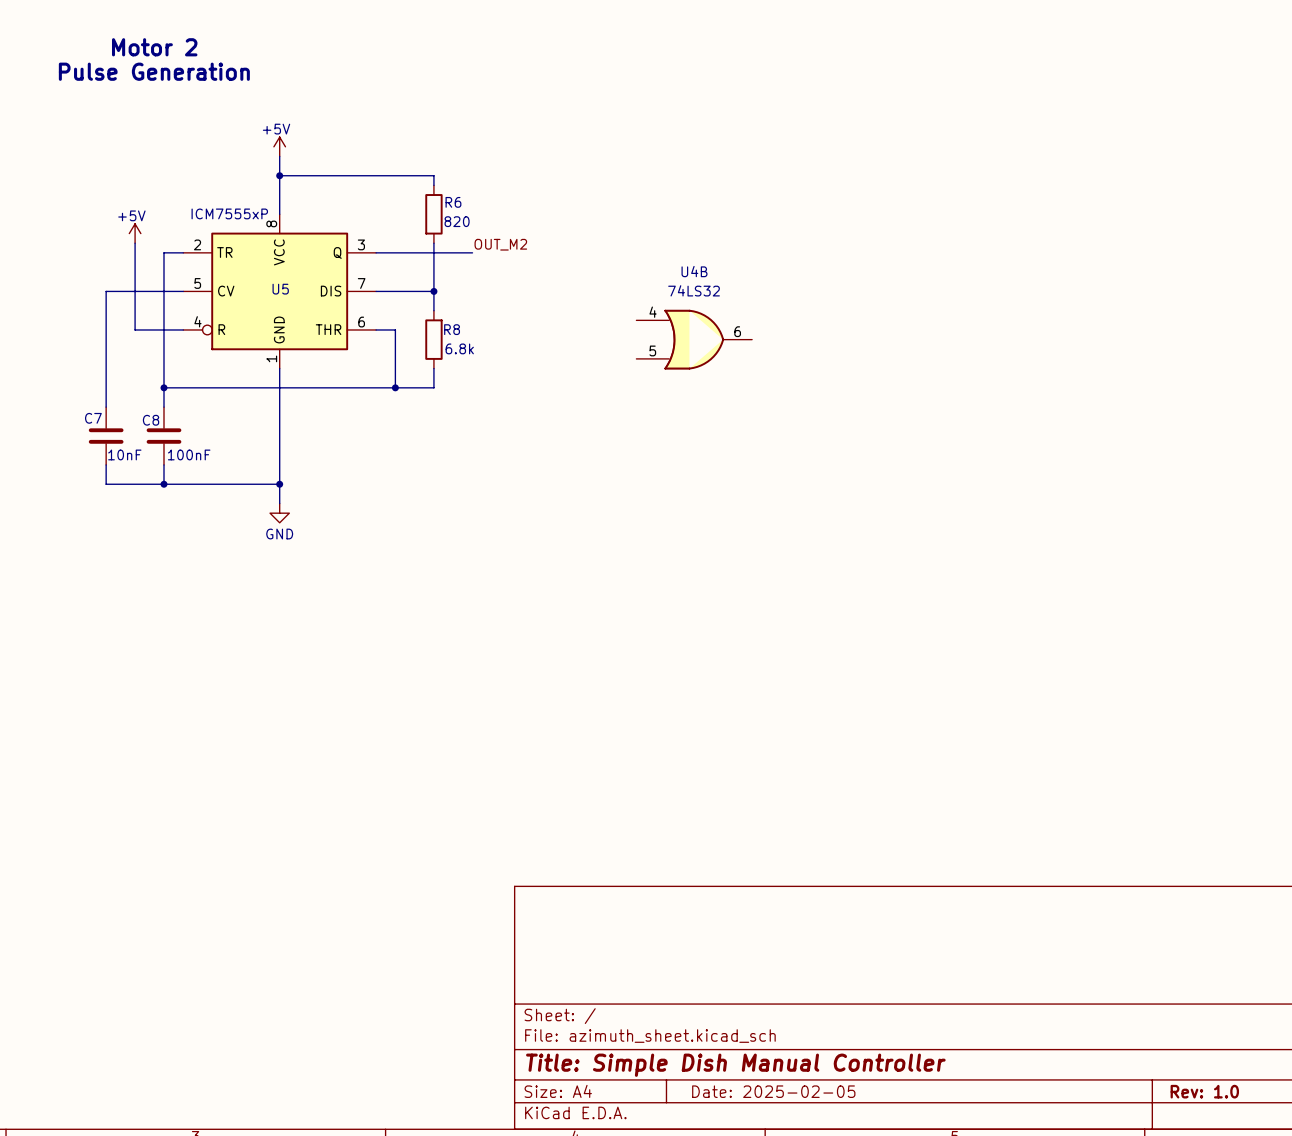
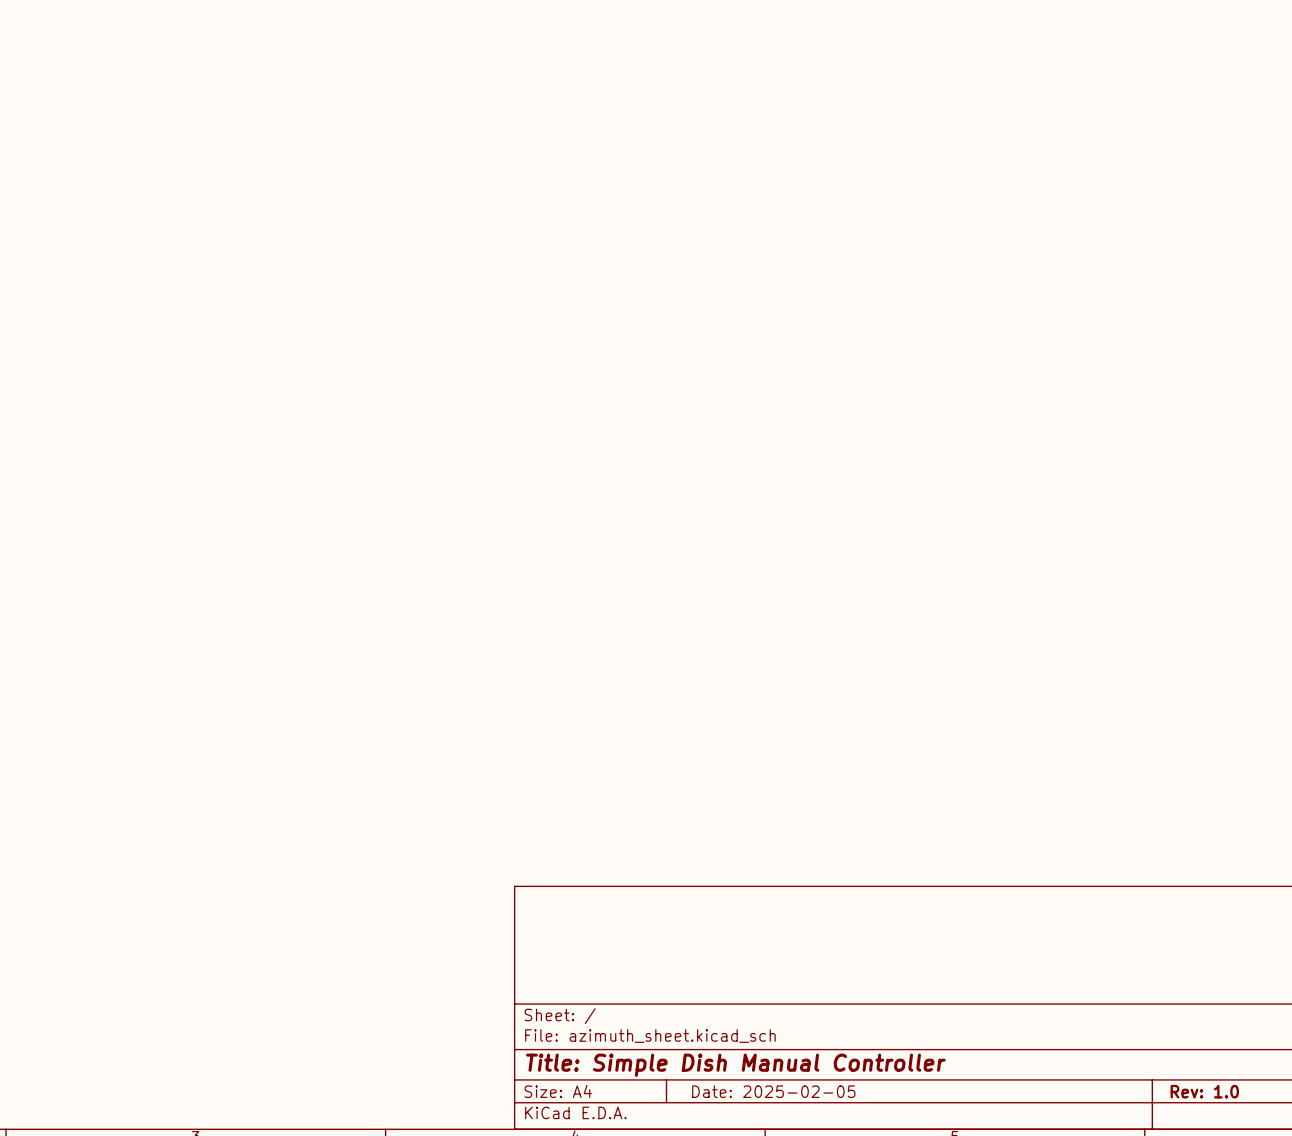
text: Motor 2 (154, 47) -> none
text: Pulse Generation (154, 71) -> none
power symbol: +5V (279, 146) -> none
wire: (279, 156) (279, 214) -> none
wire: (279, 175) (433, 175) (433, 185) -> none
junction: (279, 175) -> none
R6: 820 (433, 214) -> none
power symbol: +5V (135, 233) -> none
wire: (135, 243) (135, 329) (183, 329) -> none
wire: (433, 243) (433, 310) -> none
label: OUT_M2 (500, 244) -> none
wire: (183, 252) (163, 252) (163, 407) -> none
wire: (376, 252) (472, 252) -> none
wire: (183, 291) (106, 291) (106, 407) -> none
U5: ICM7555xP (279, 291) -> none
wire: (376, 291) (433, 291) -> none
junction: (433, 291) -> none
wire: (376, 329) (395, 329) (395, 387) -> none
R8: 6.8k (433, 339) -> none
U4B: 74LS32 (694, 339) -> none
wire: (279, 368) (279, 503) -> none
wire: (433, 368) (433, 387) (163, 387) -> none
junction: (163, 387) -> none
junction: (395, 387) -> none
C7: 10nF (106, 436) -> none
C8: 100nF (163, 436) -> none
wire: (106, 464) (106, 484) (279, 484) -> none
wire: (163, 464) (163, 484) -> none
junction: (163, 484) -> none
junction: (279, 484) -> none
power symbol: GND (279, 513) -> none

